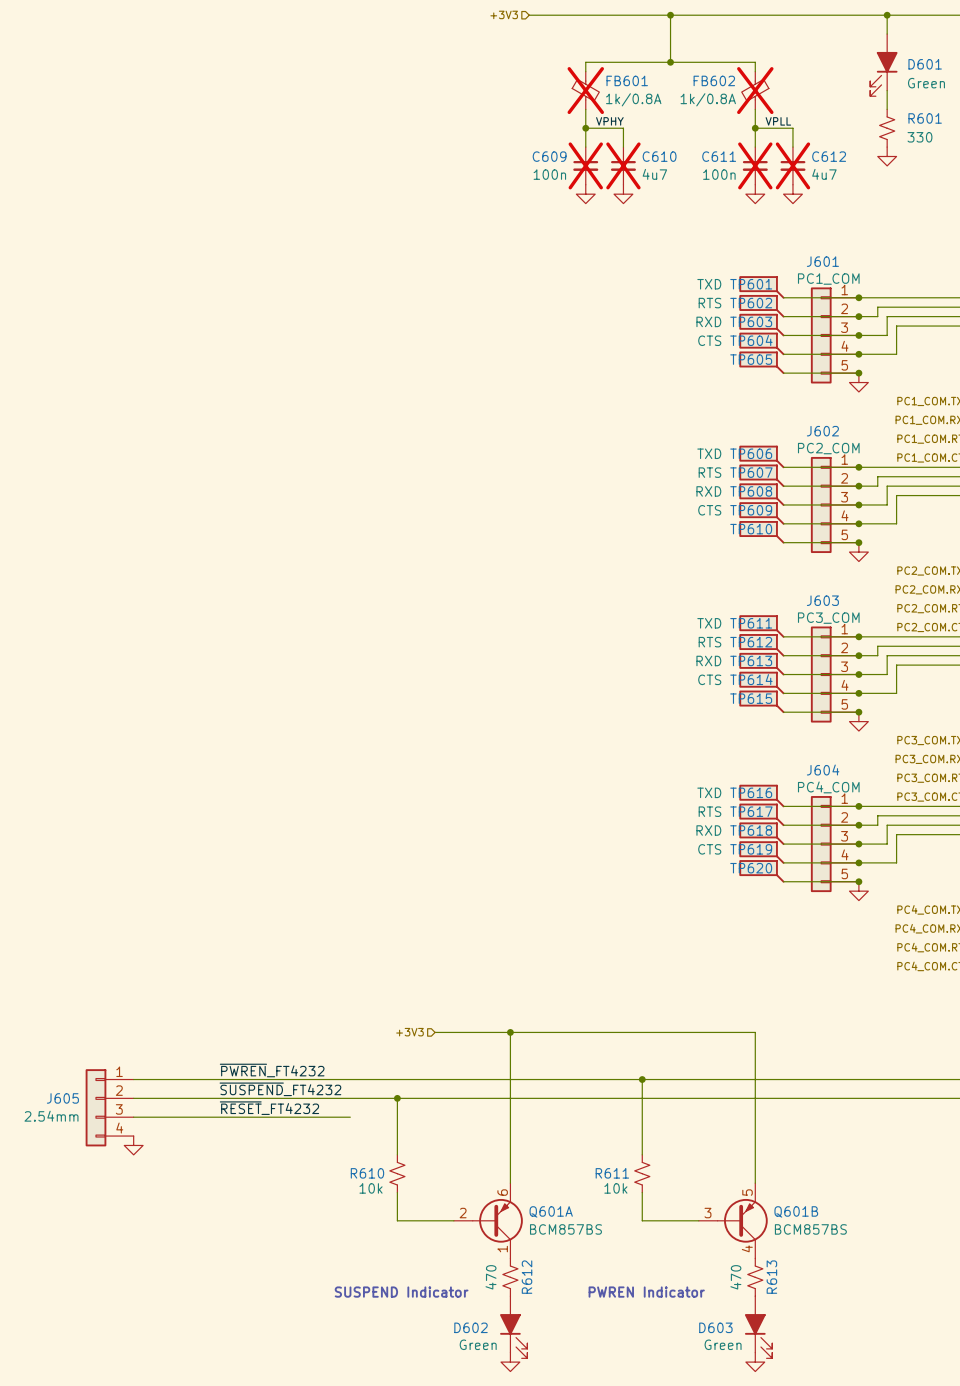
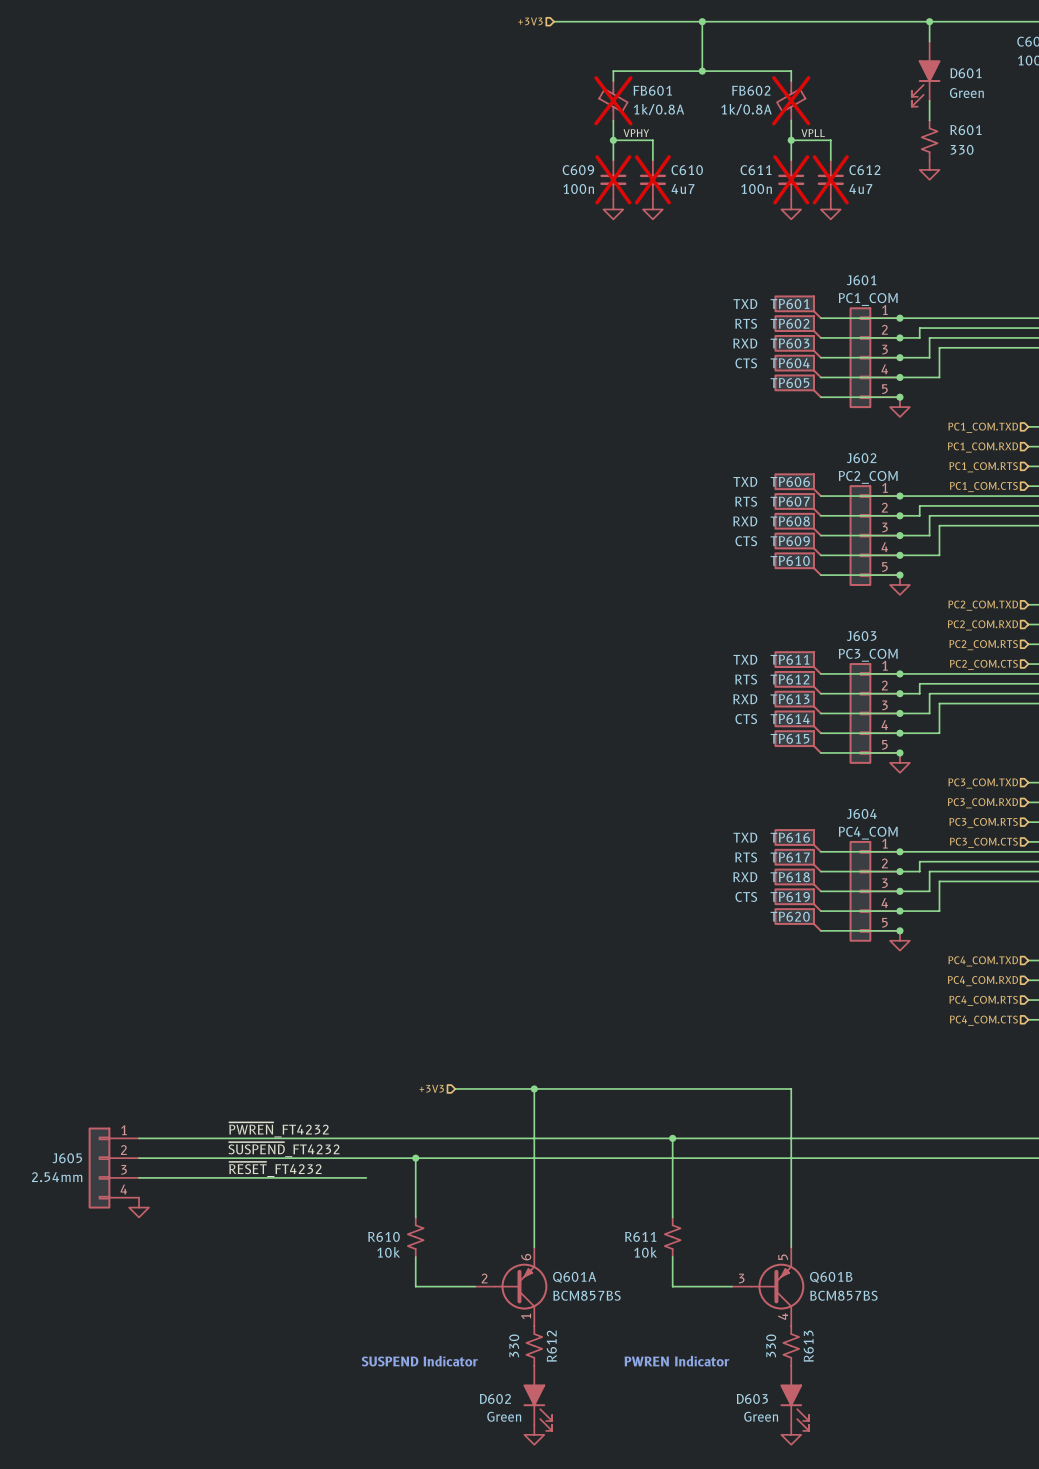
R612 value: 470 (491, 1277) -> 330 (514, 1345)
R613 value: 470 (735, 1277) -> 330 (771, 1345)

